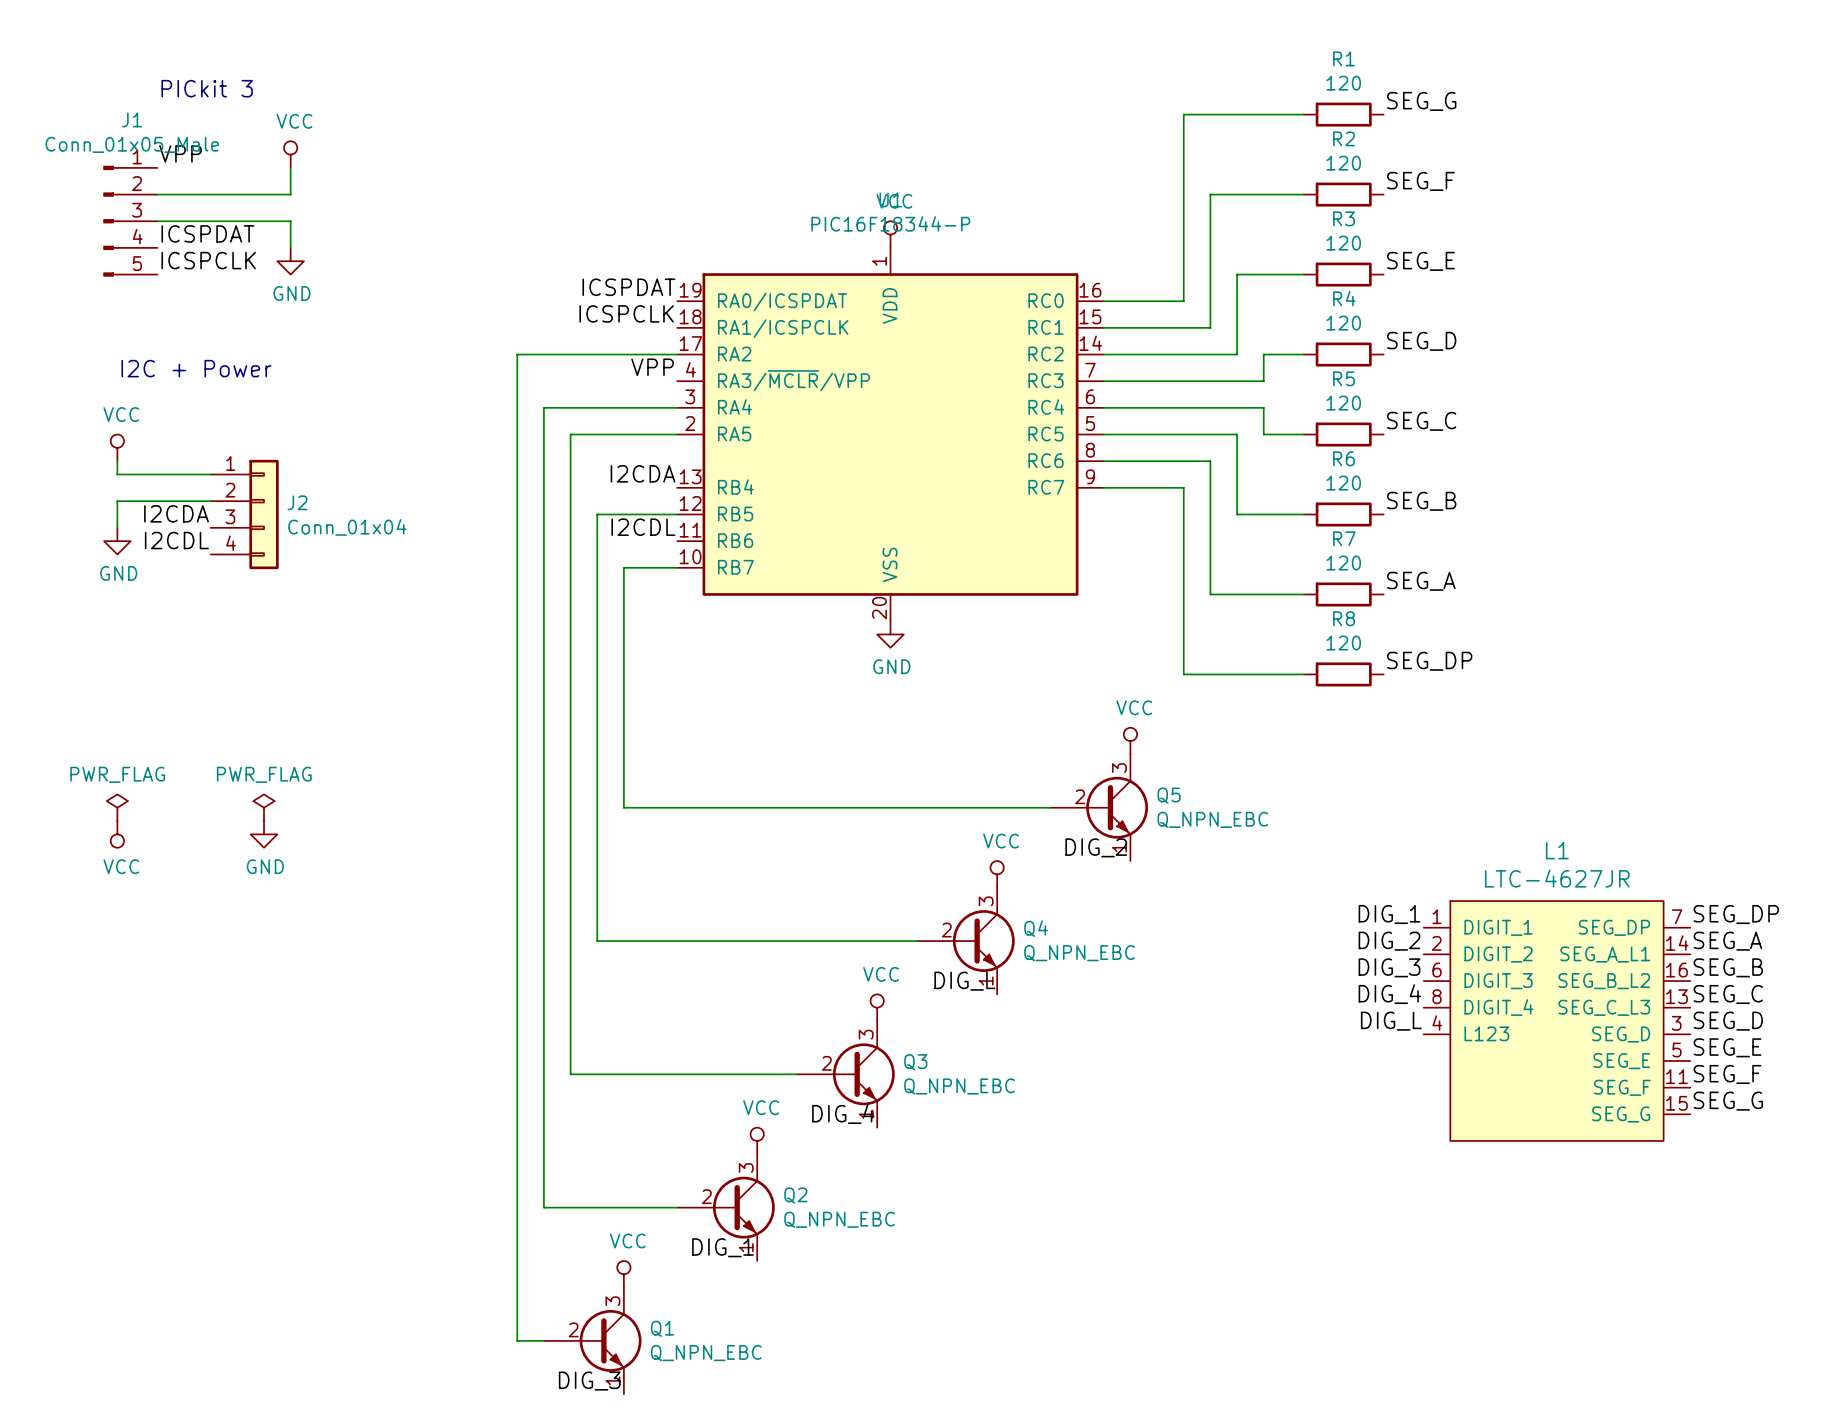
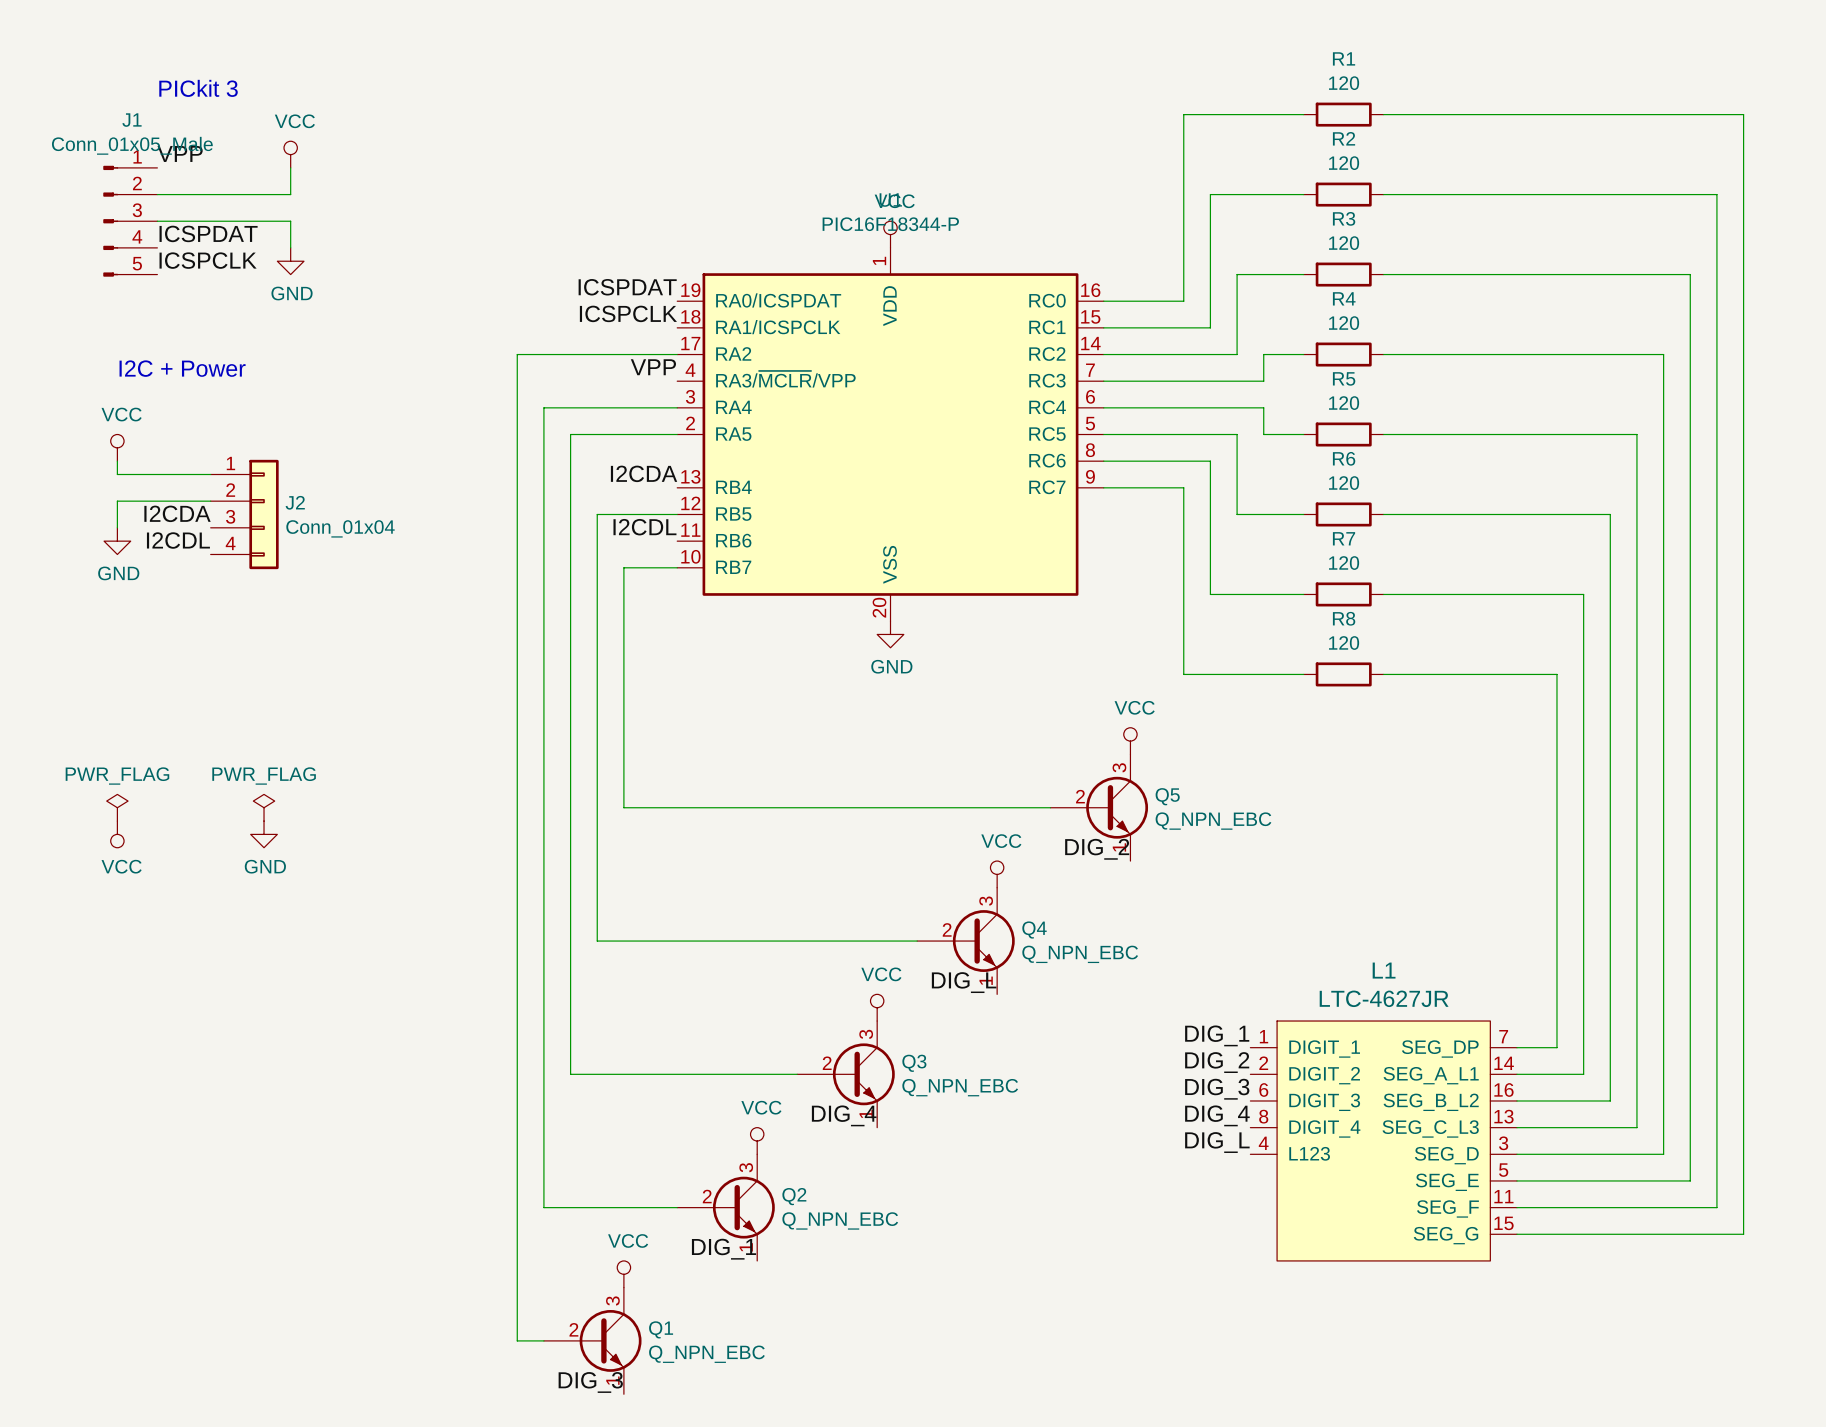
label: SEG_G (1421, 101) -> none
wire: none -> (1383, 114) (1743, 114) (1743, 1234) (1516, 1234)
label: SEG_F (1420, 181) -> none
wire: none -> (1383, 194) (1716, 194) (1716, 1207) (1516, 1207)
label: SEG_E (1420, 261) -> none
wire: none -> (1383, 274) (1690, 274) (1690, 1180) (1516, 1180)
label: SEG_D (1421, 341) -> none
wire: none -> (1383, 354) (1663, 354) (1663, 1154) (1516, 1154)
label: SEG_C (1421, 421) -> none
wire: none -> (1383, 434) (1636, 434) (1636, 1127) (1516, 1127)
label: SEG_B (1421, 501) -> none
wire: none -> (1383, 514) (1610, 514) (1610, 1100) (1516, 1100)
label: SEG_A (1421, 581) -> none
wire: none -> (1383, 594) (1583, 594) (1583, 1074) (1516, 1074)
label: SEG_DP (1429, 661) -> none
wire: none -> (1383, 674) (1556, 674) (1556, 1047) (1516, 1047)
label position: DIG_1 (1389, 914) -> DIG_1 (1217, 1035)
label: SEG_DP (1736, 914) -> none
label position: DIG_2 (1389, 941) -> DIG_2 (1217, 1062)
label: SEG_A (1727, 941) -> none
label position: DIG_3 (1389, 967) -> DIG_3 (1217, 1089)
label: SEG_B (1728, 967) -> none
label position: DIG_4 (1389, 994) -> DIG_4 (1217, 1115)
label: SEG_C (1728, 994) -> none
label position: DIG_L (1391, 1021) -> DIG_L (1217, 1142)
L1 position: (1556, 1021) -> (1383, 1140)
label: SEG_D (1728, 1021) -> none
label: SEG_E (1727, 1047) -> none
label: SEG_F (1727, 1074) -> none
label: SEG_G (1728, 1101) -> none

